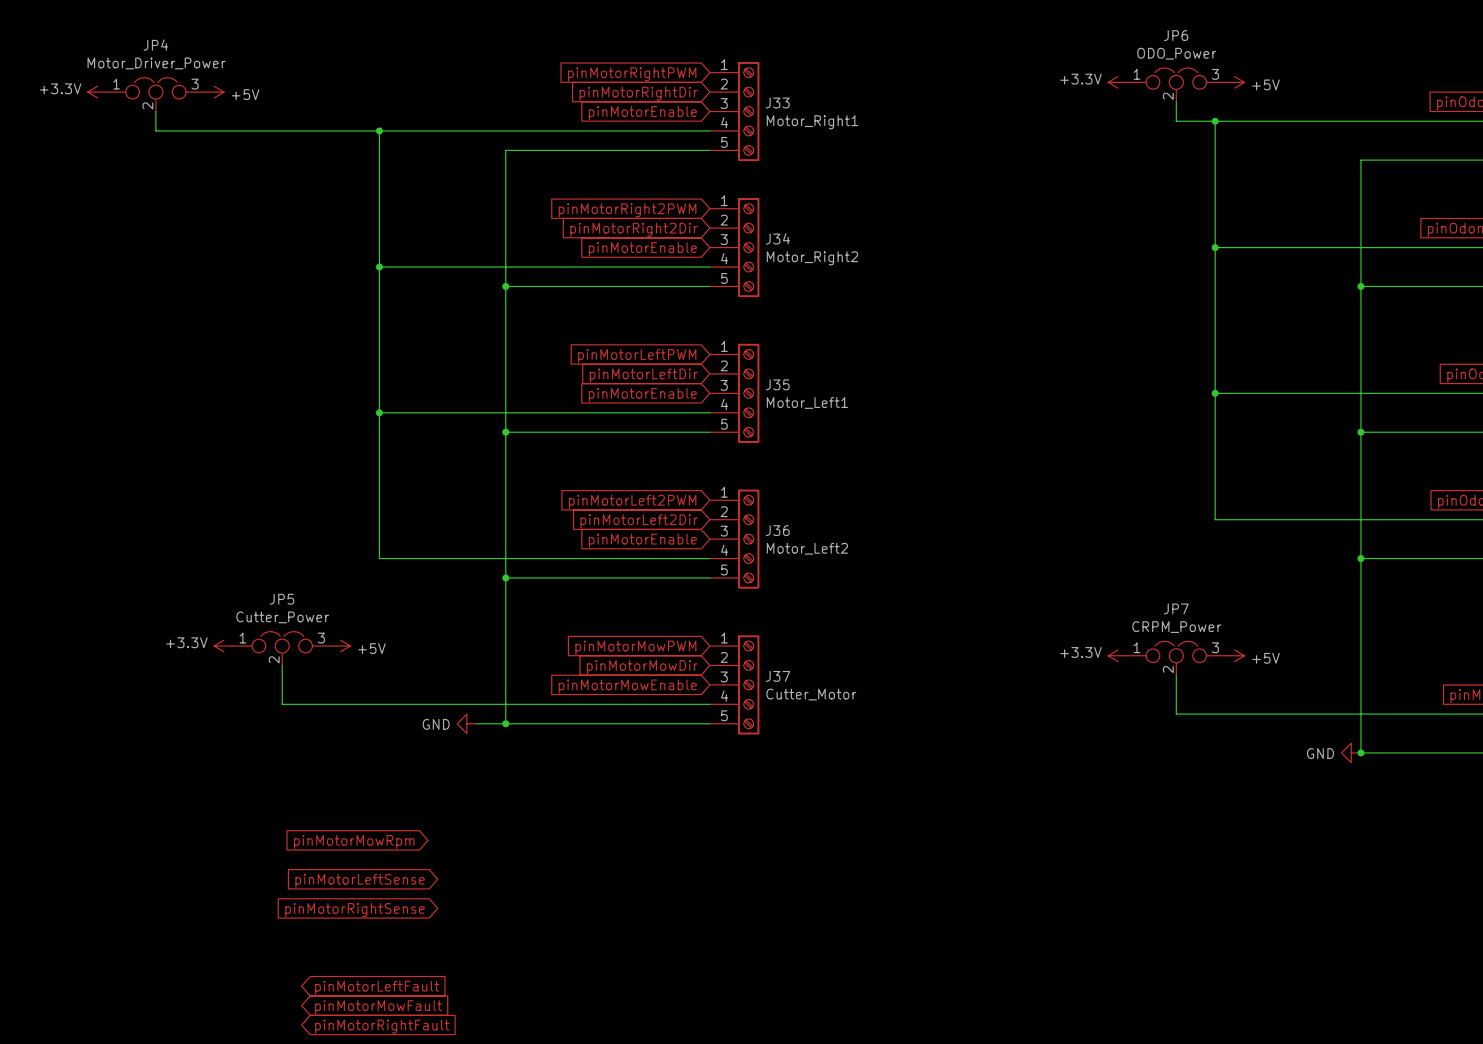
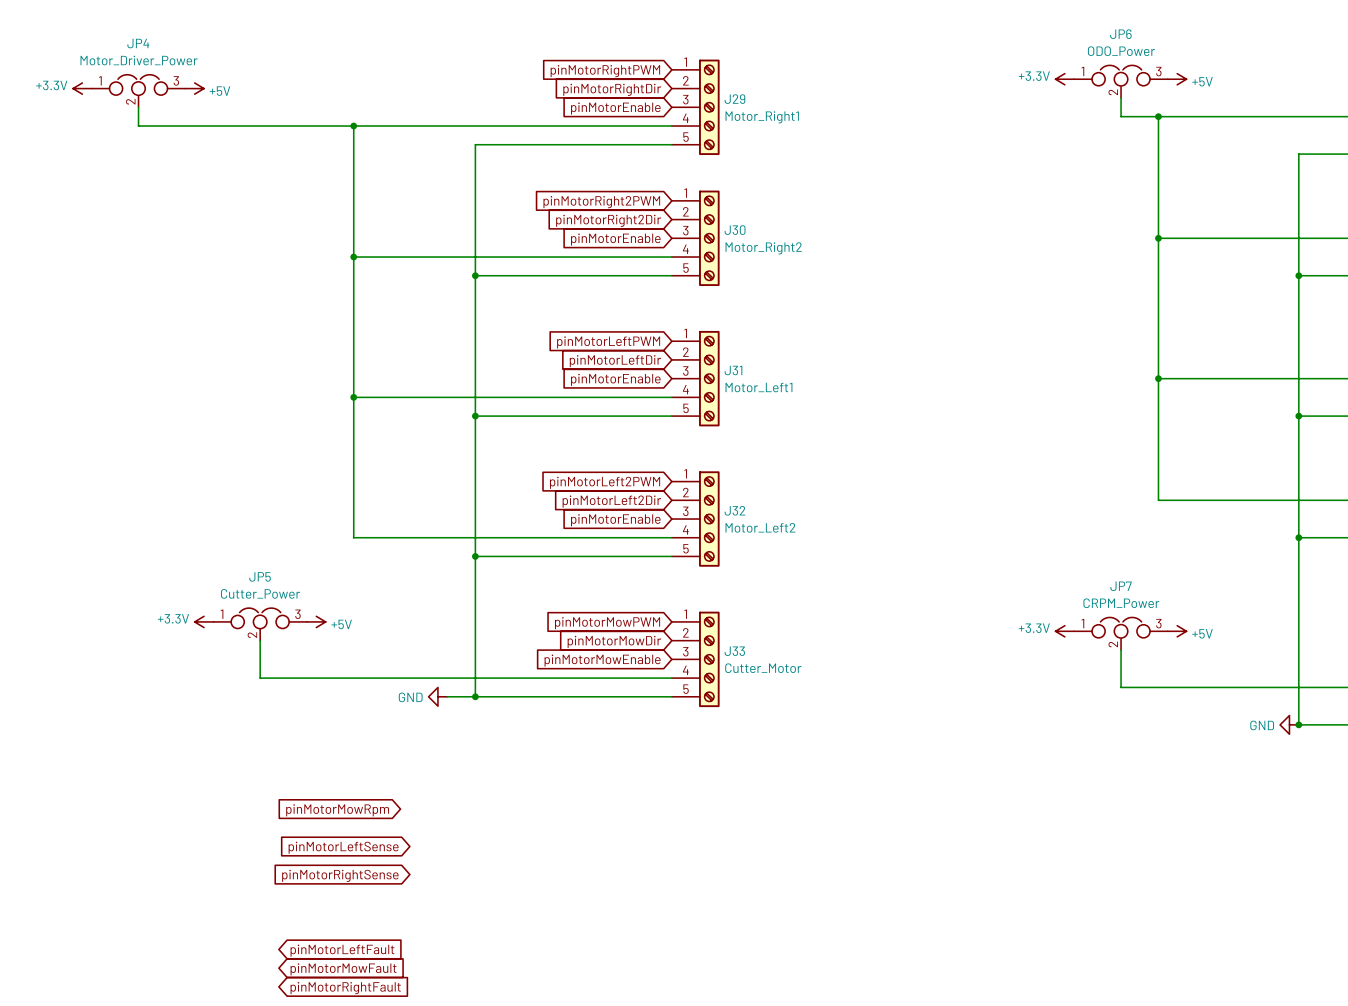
J33 name: J33 (777, 103) -> J29 (734, 99)
J34 name: J34 (777, 238) -> J30 (735, 230)
J35 name: J35 (777, 384) -> J31 (733, 370)
J36 name: J36 (777, 530) -> J32 (734, 510)
J37 name: J37 (777, 676) -> J33 (734, 651)

